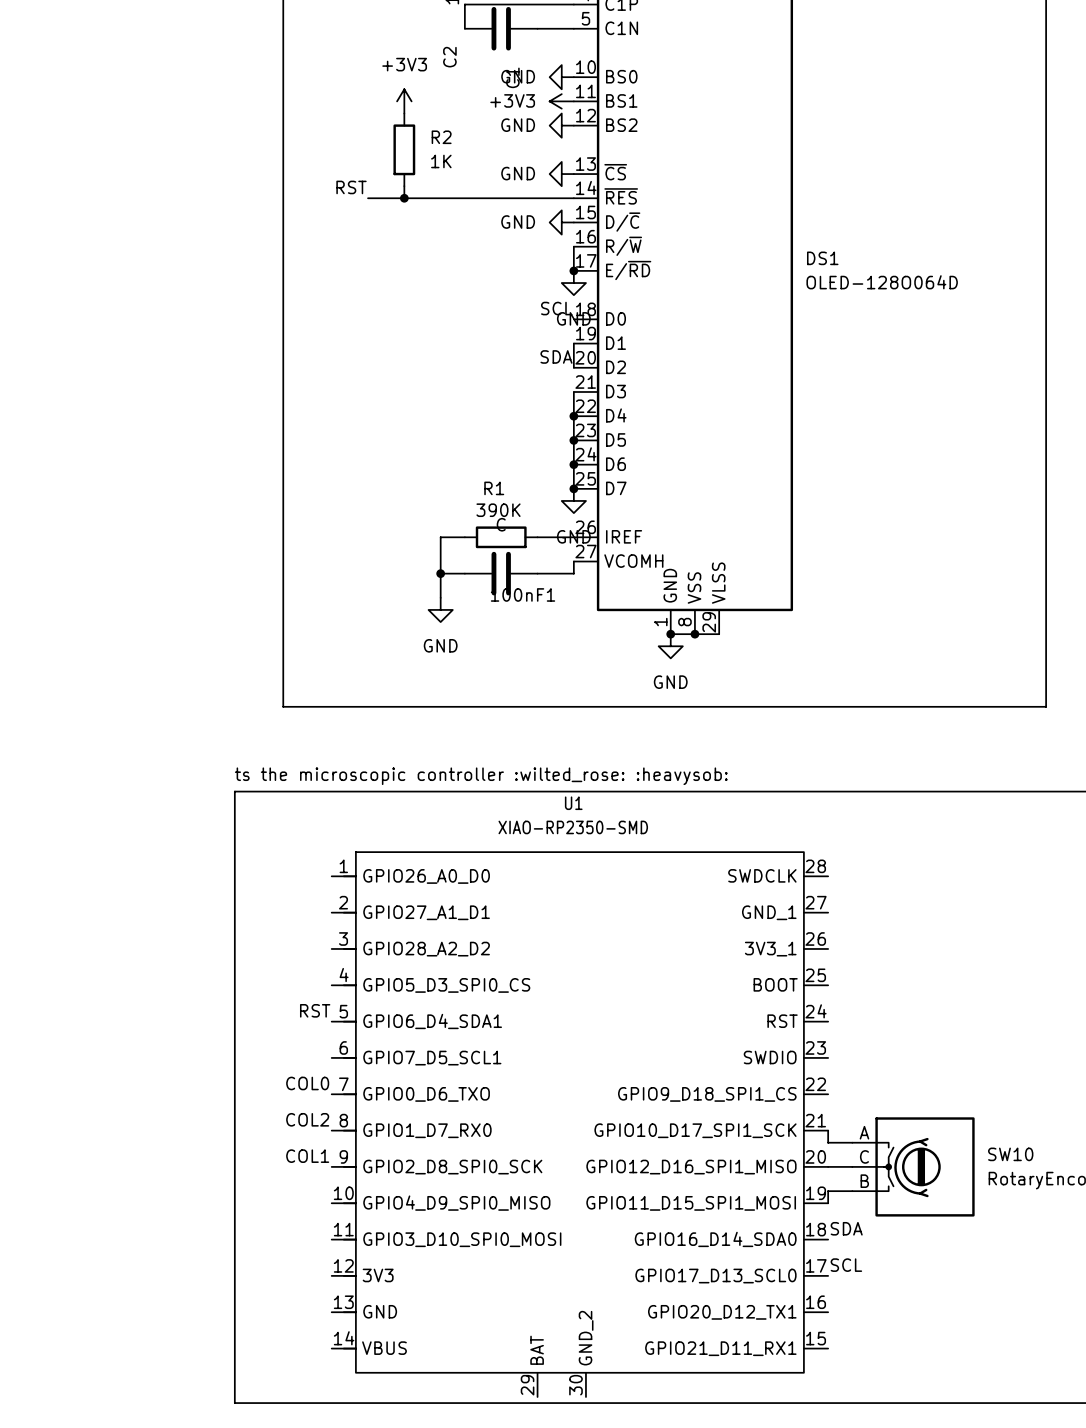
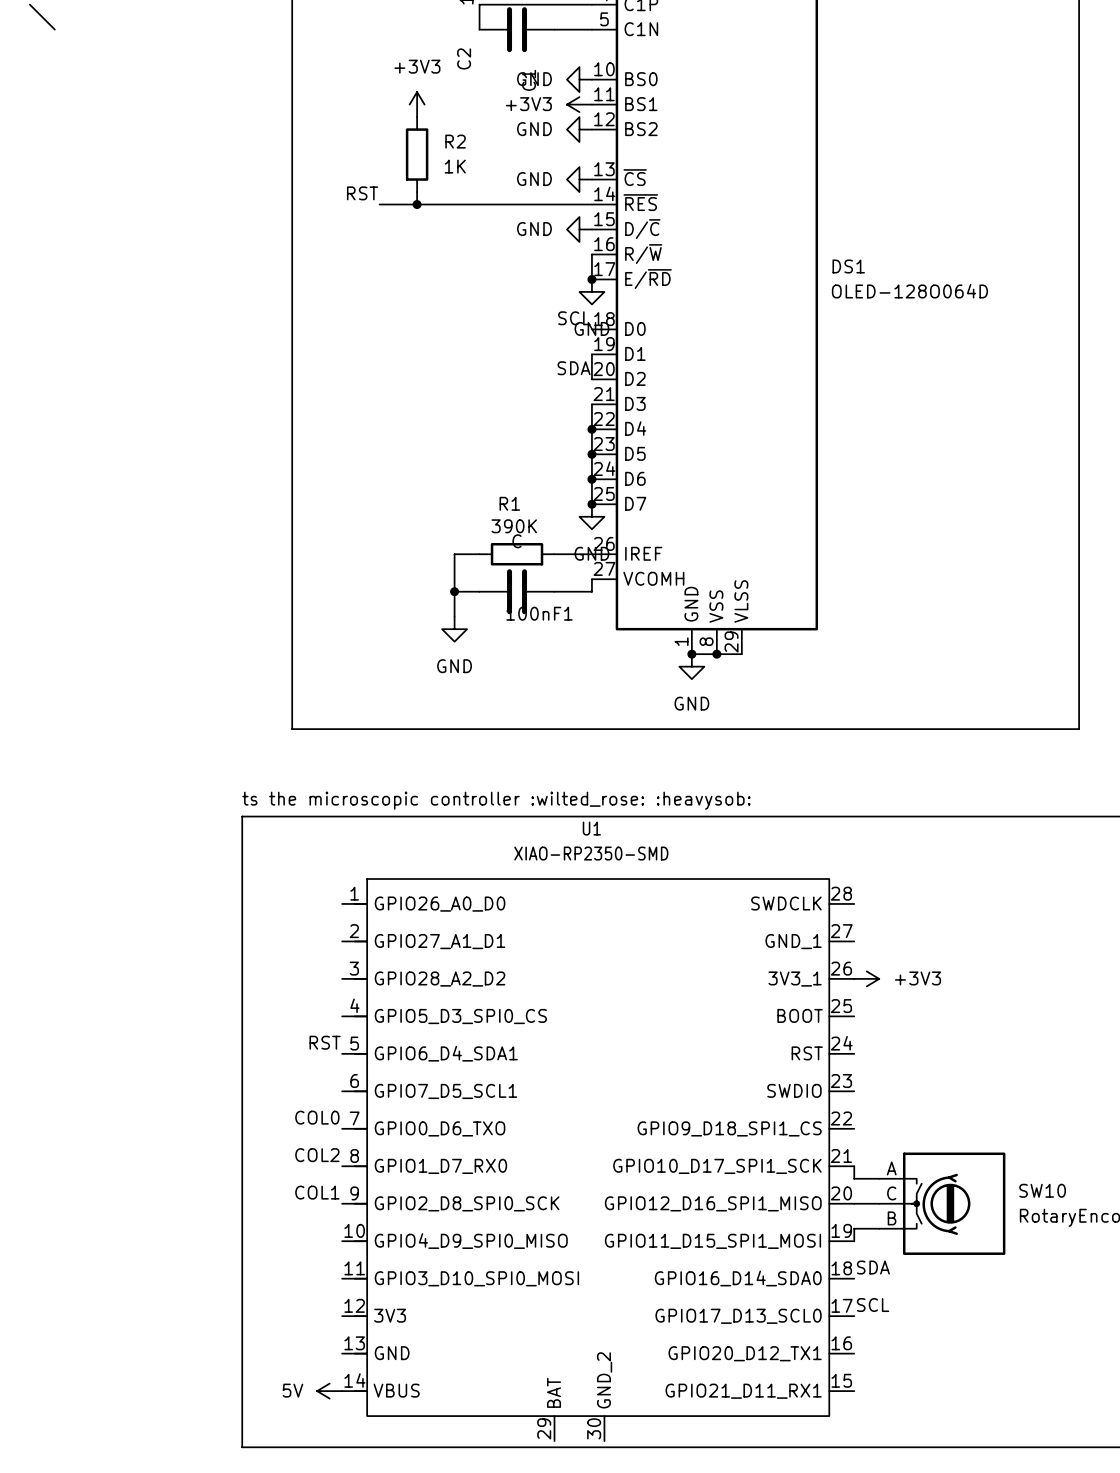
wire: none -> (29, 4) (54, 29)
power symbol: none -> +3V3 (866, 978)
power symbol: none -> 5V (329, 1391)

